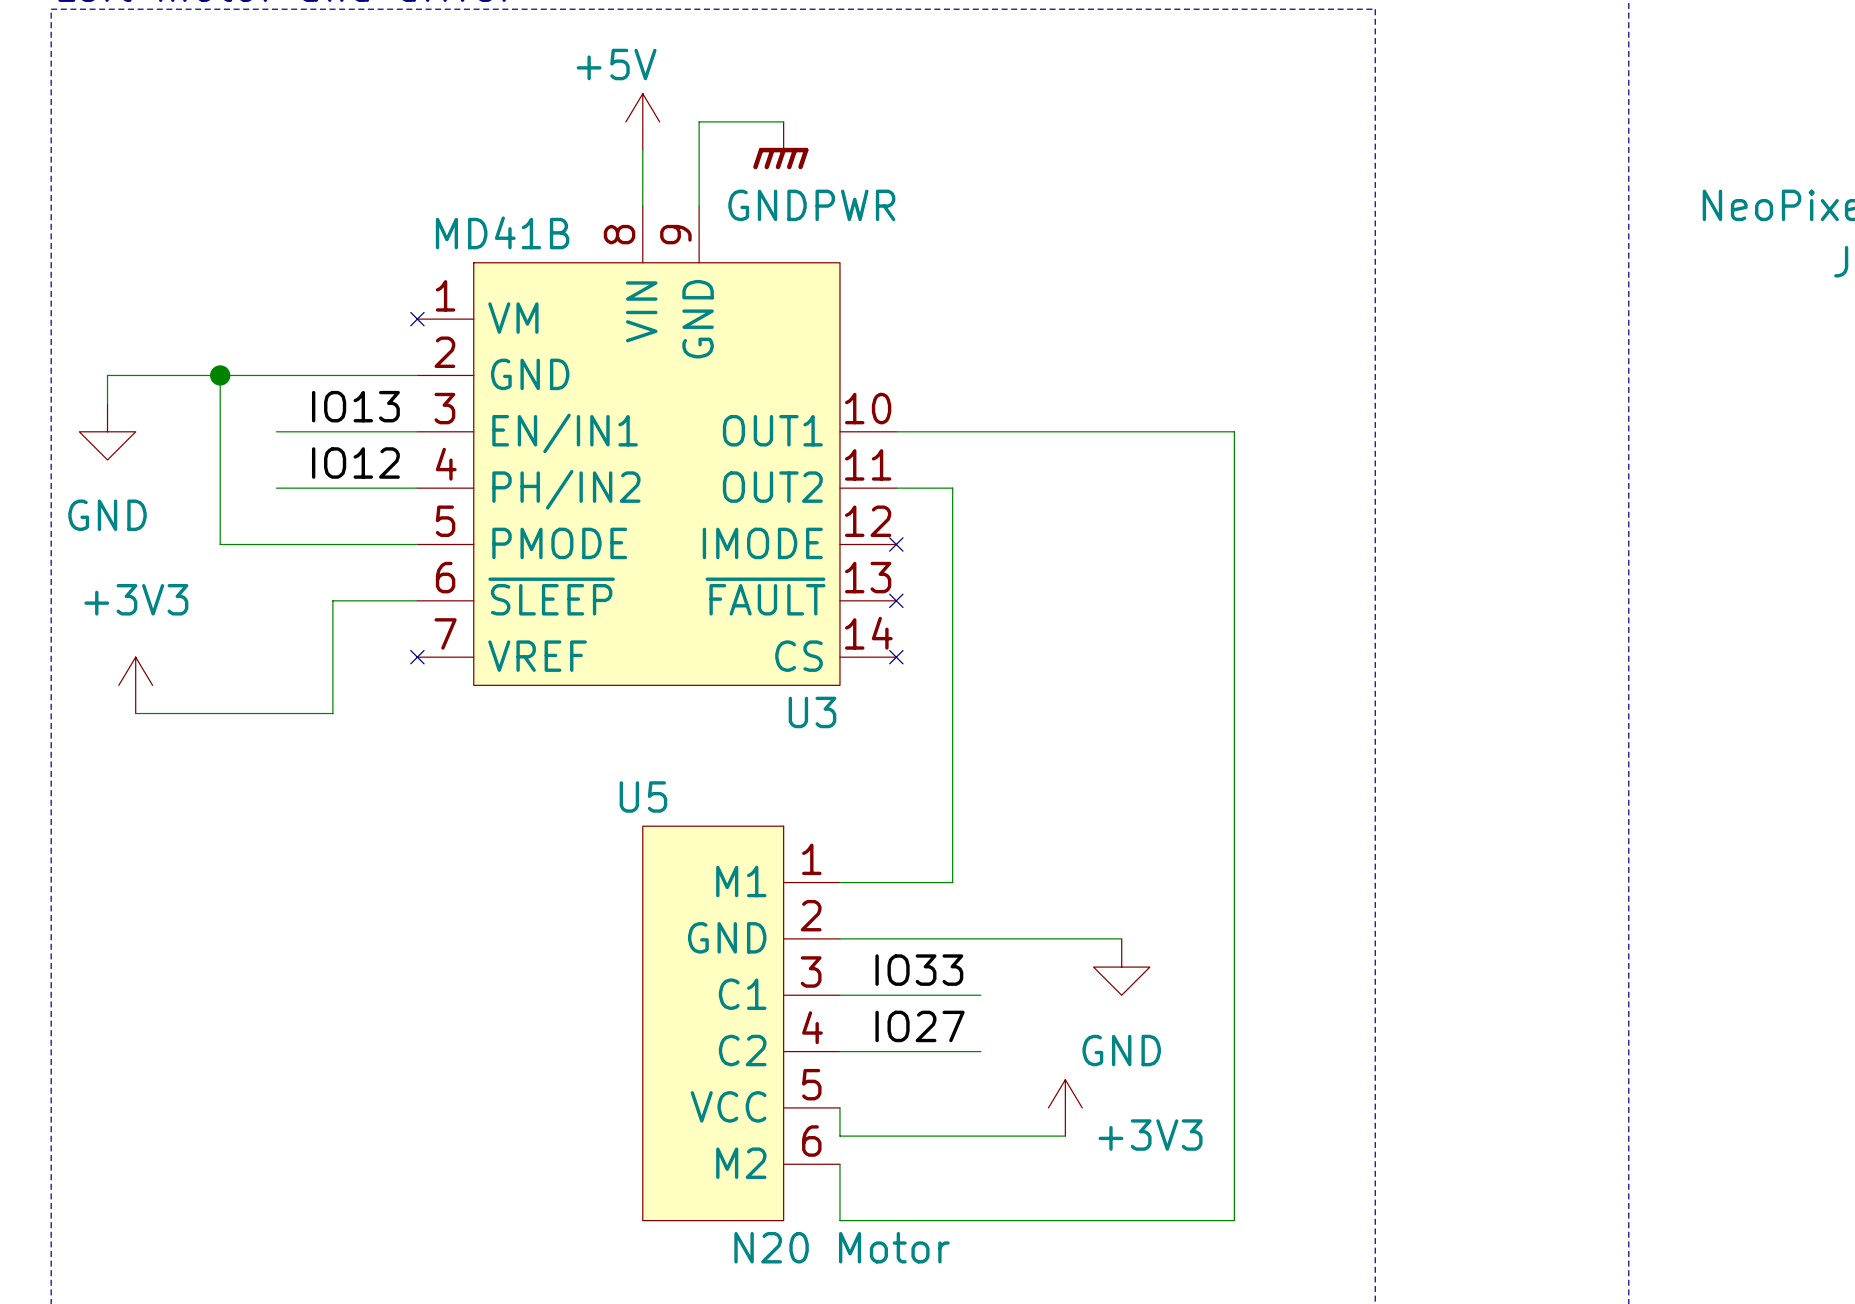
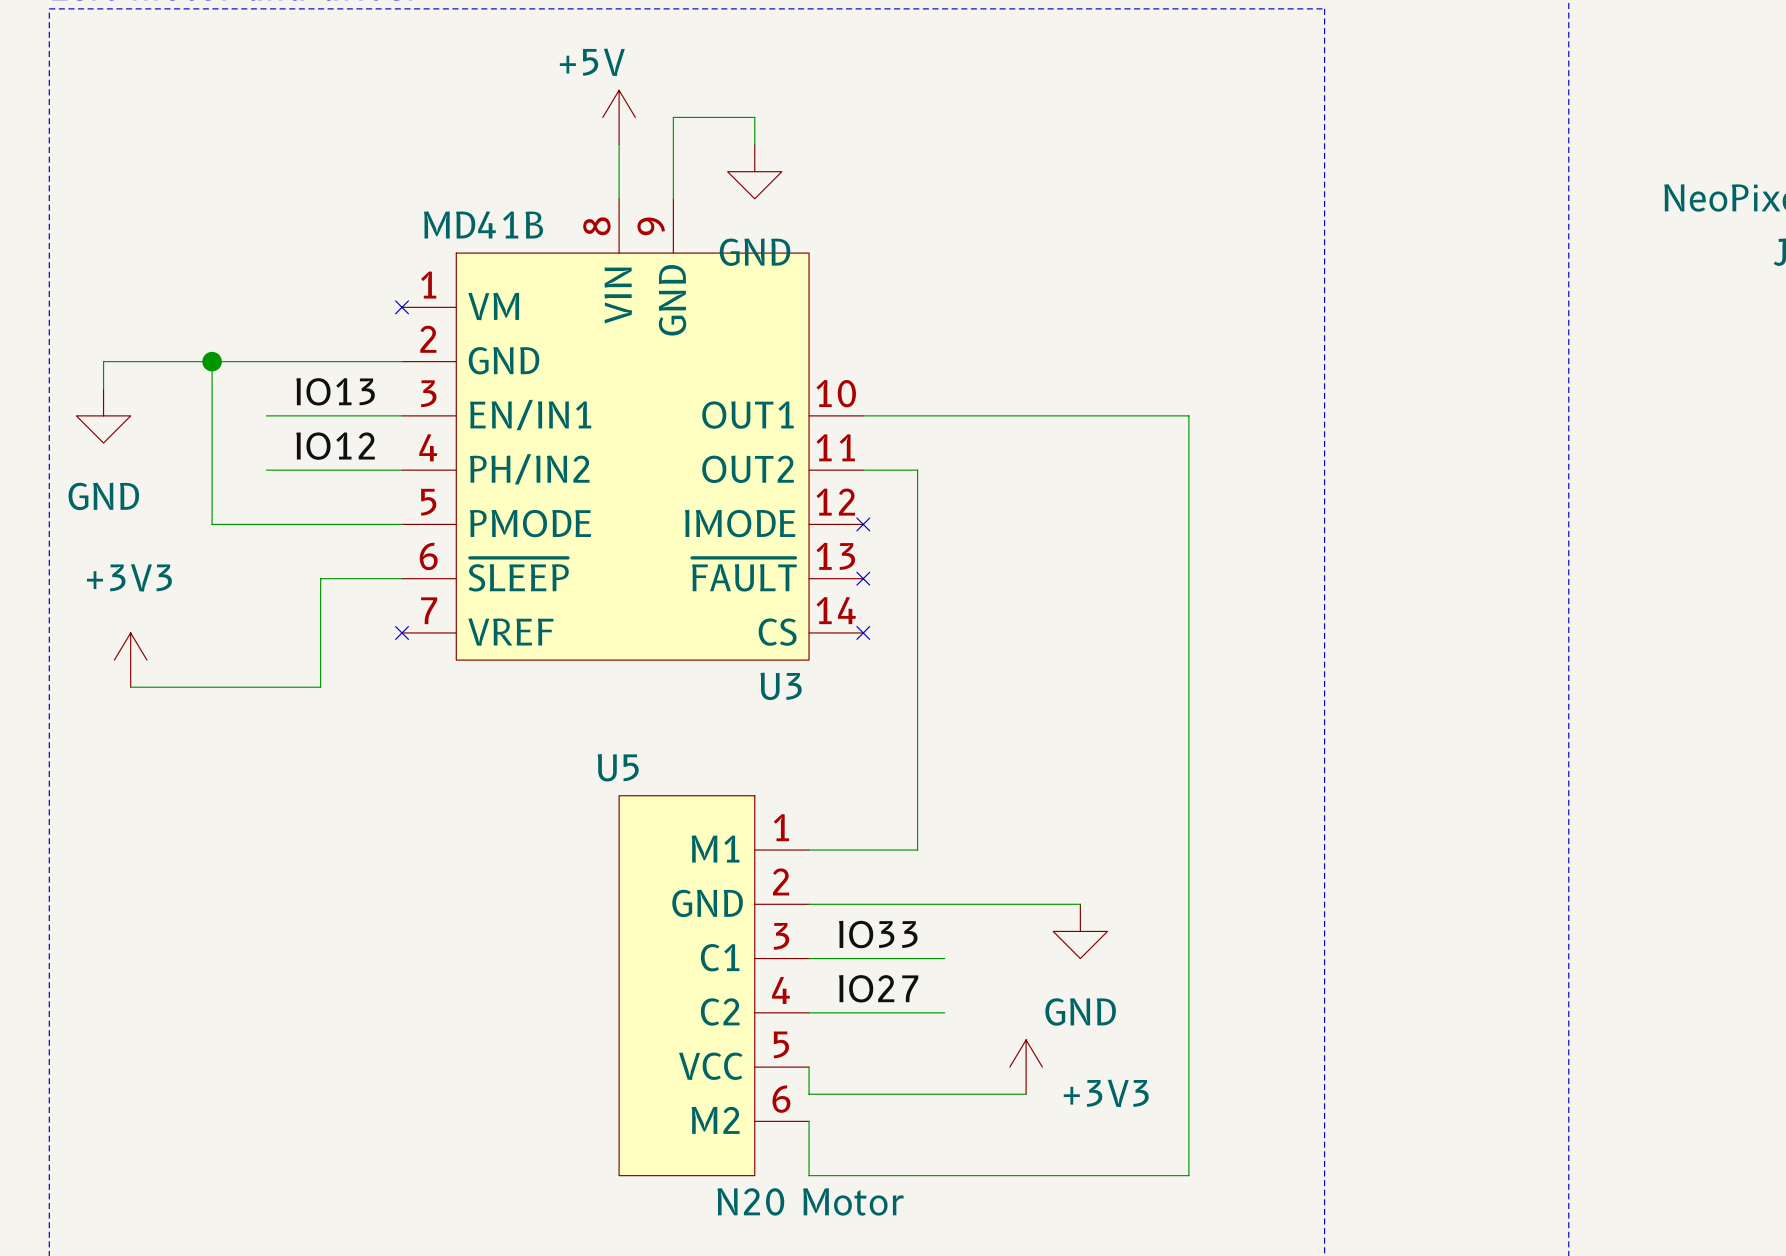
power symbol: GNDPWR (780, 145) -> none
power symbol: none -> GND (754, 171)

